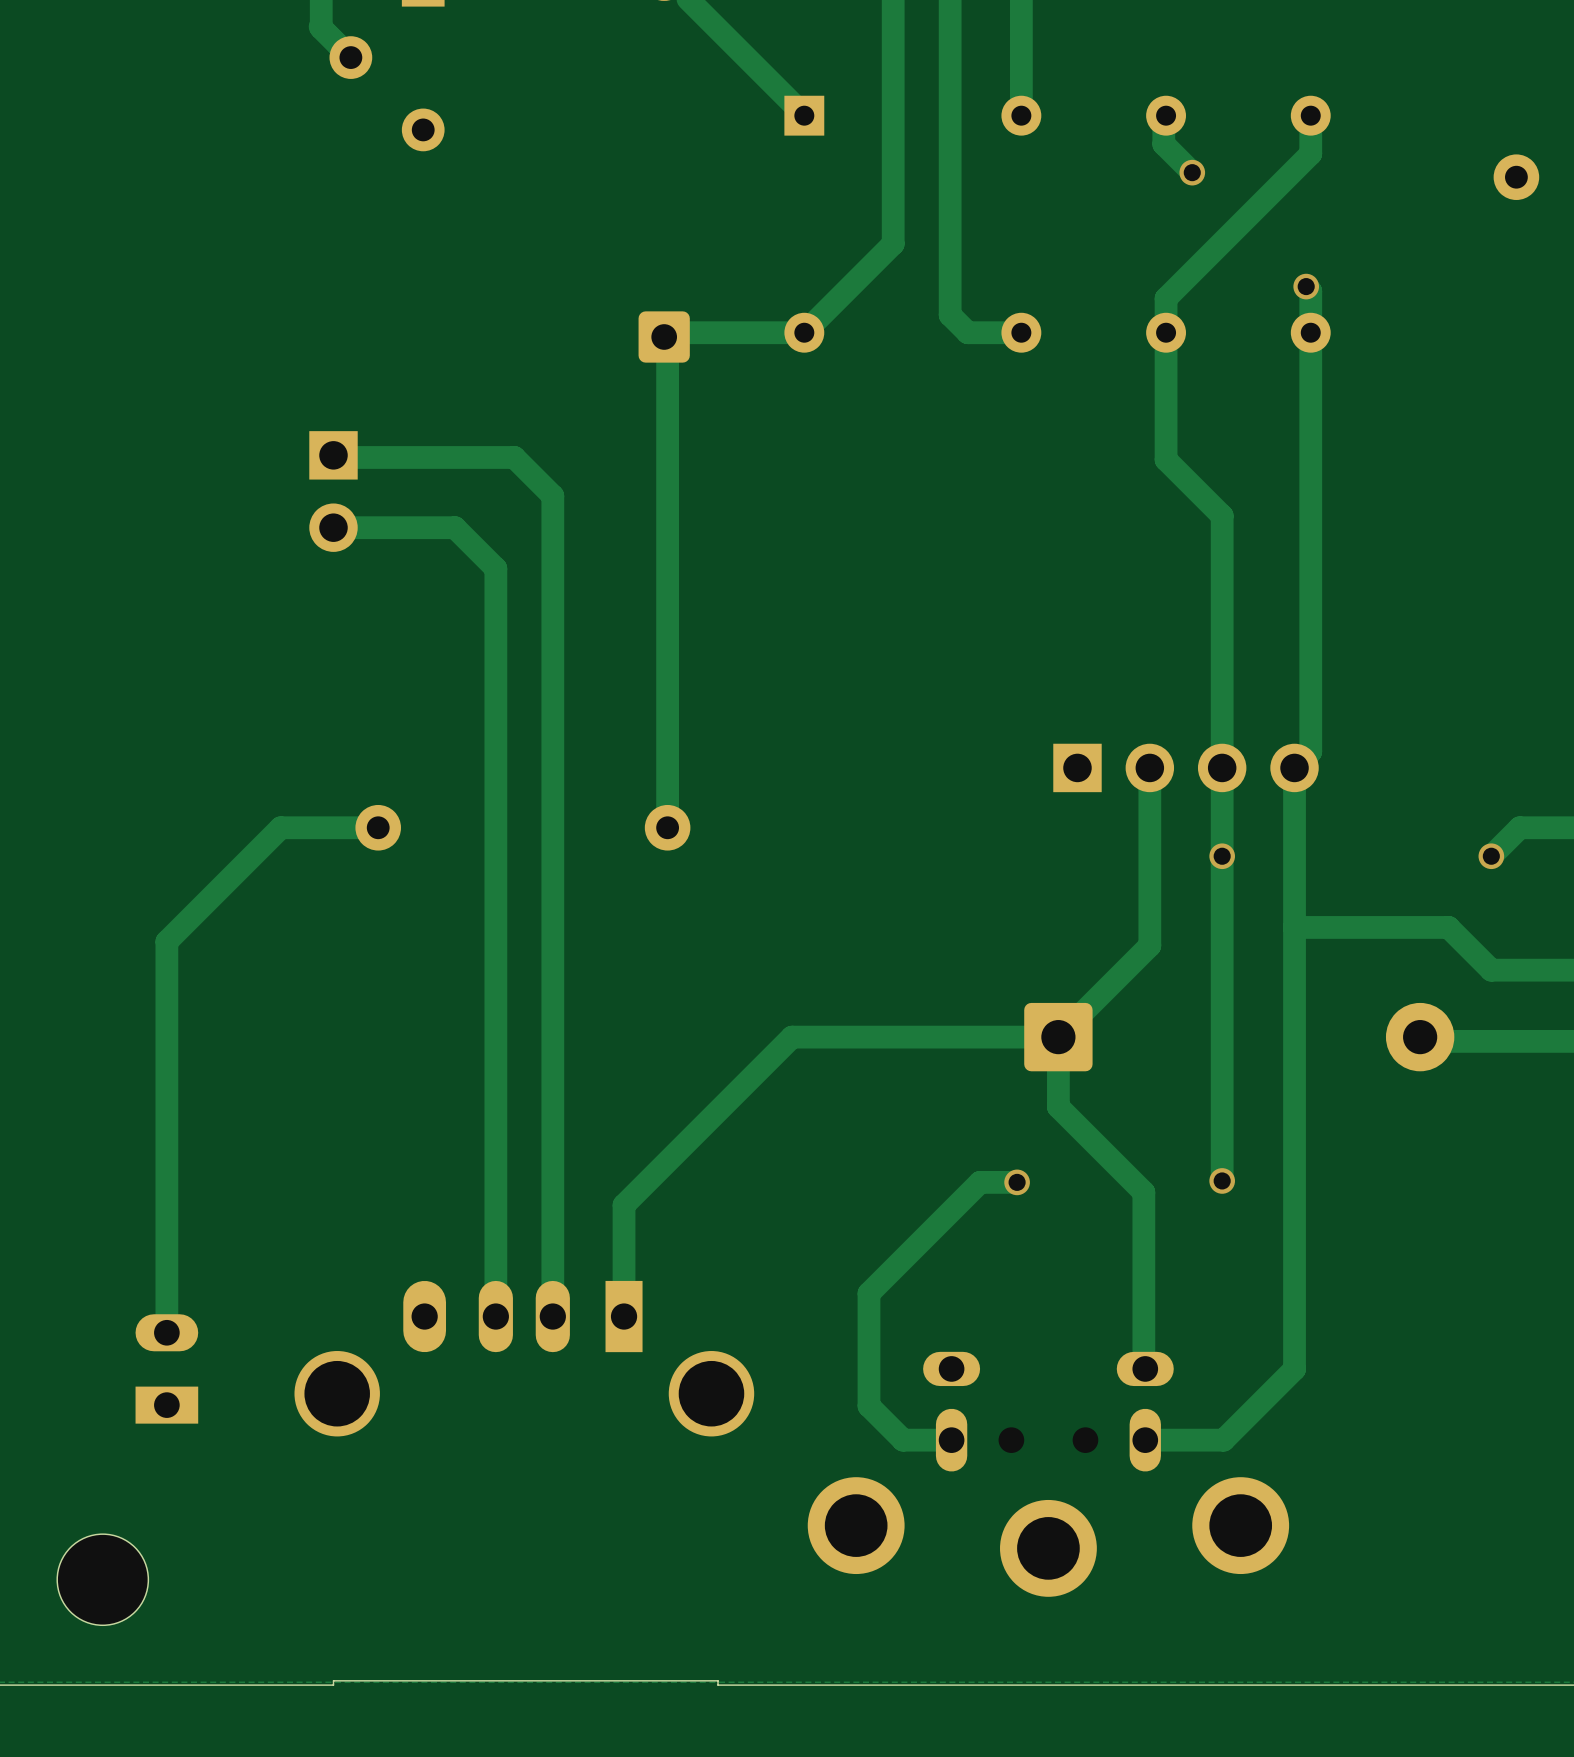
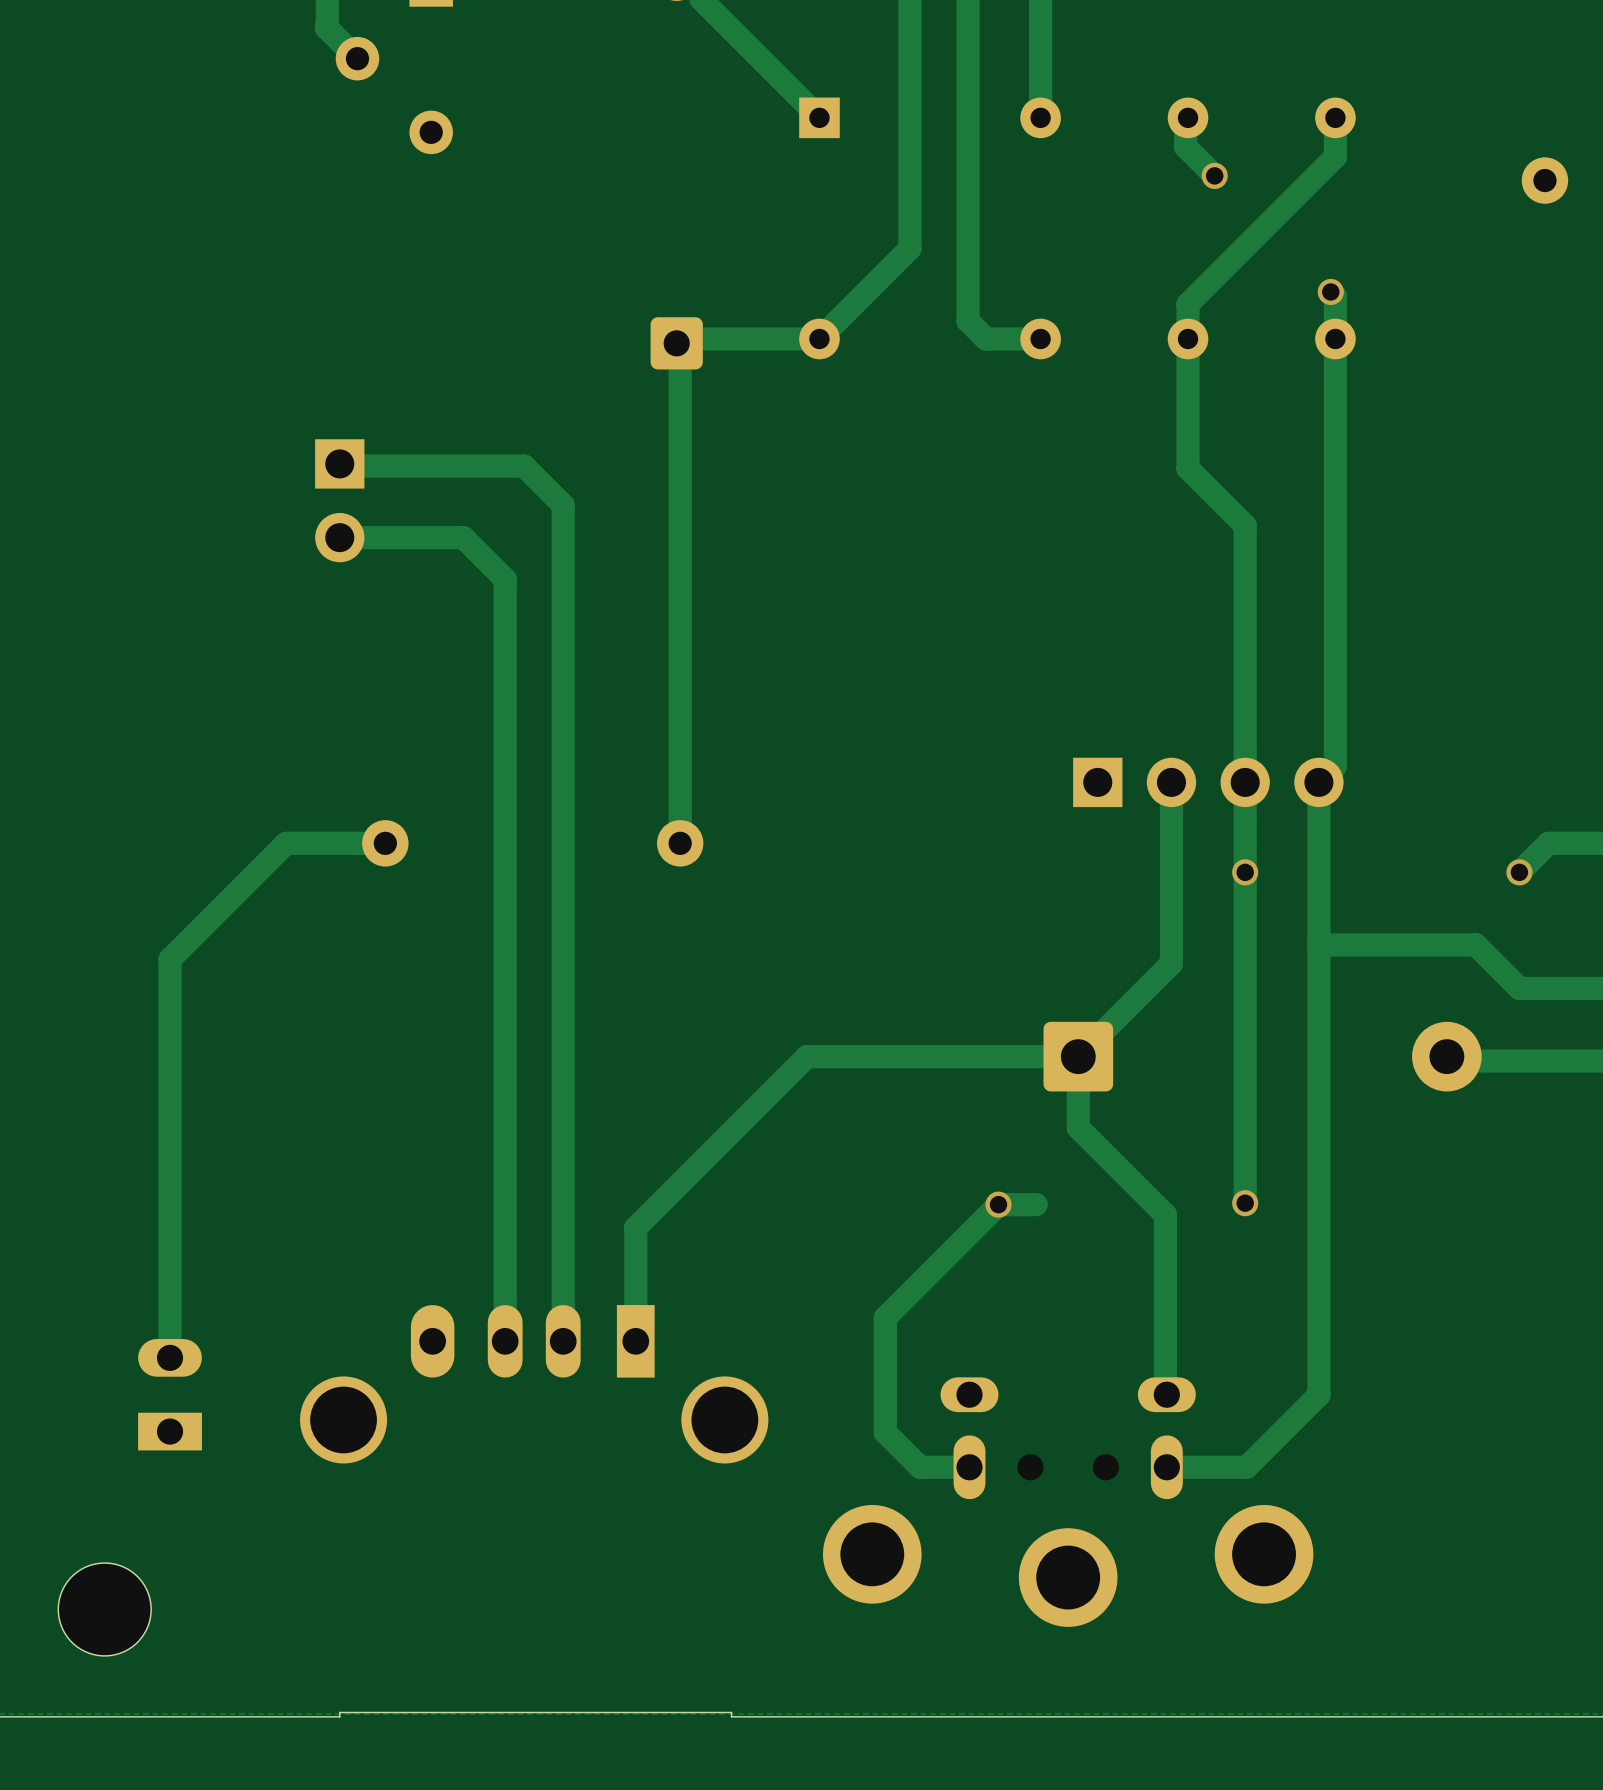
via position: (1017, 1182) -> (998, 1204)

